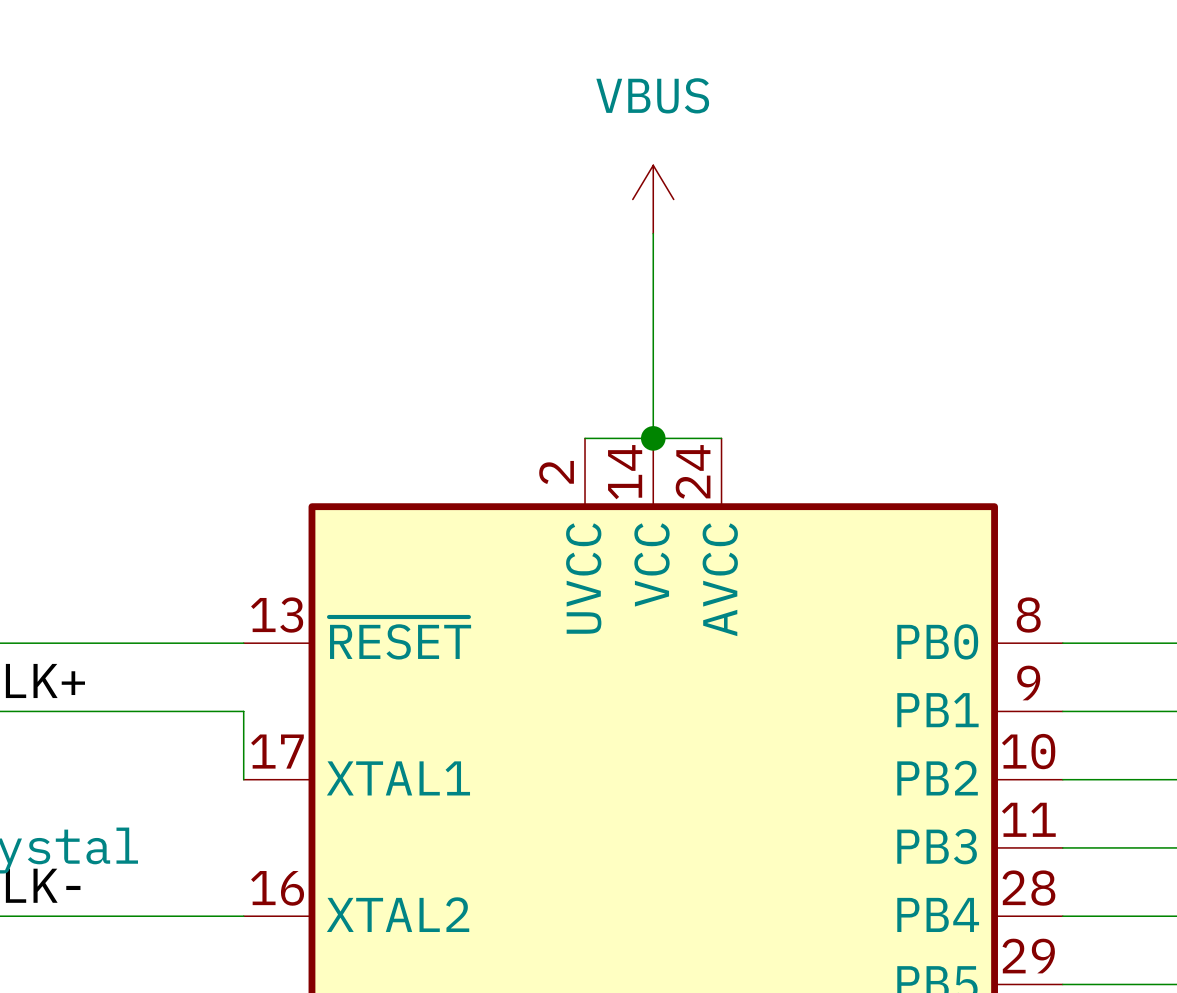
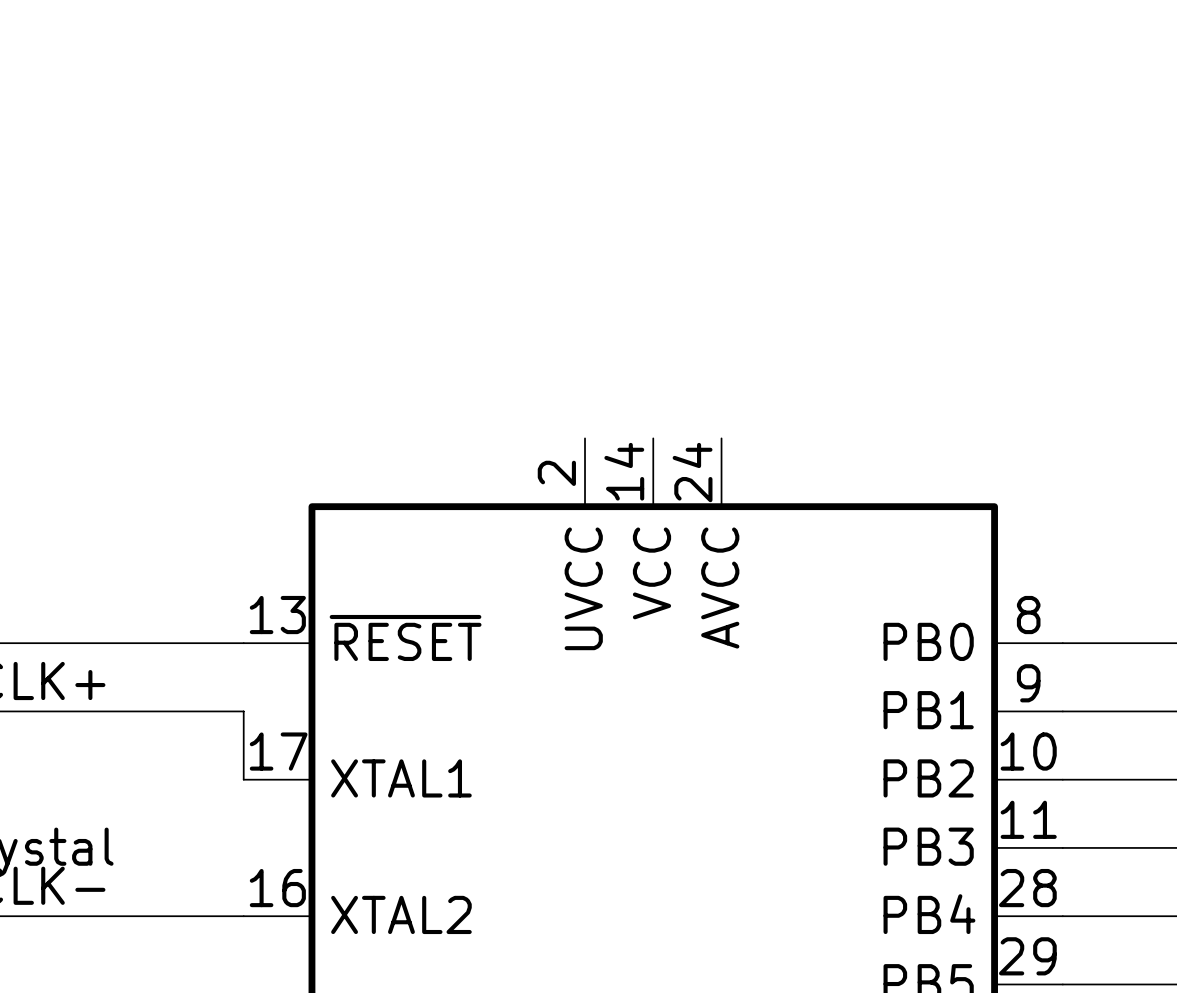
power symbol: VBUS (653, 199) -> none
wire: (653, 233) (653, 438) -> none
wire: (585, 438) (721, 438) -> none
junction: (653, 438) -> none

